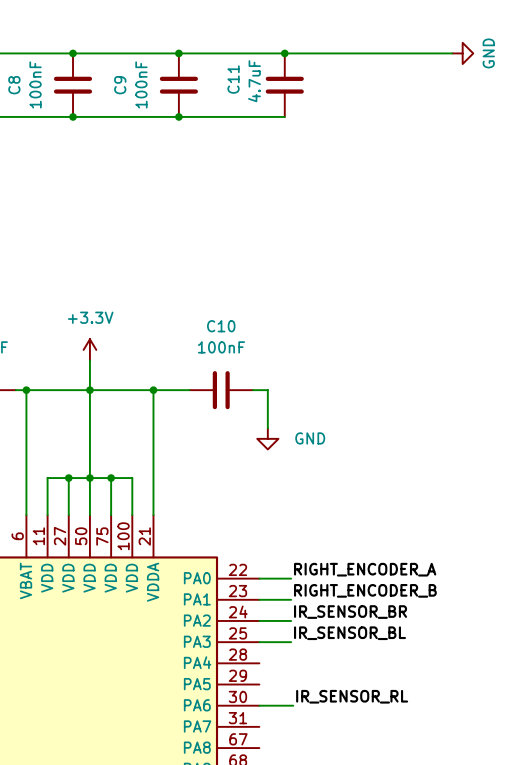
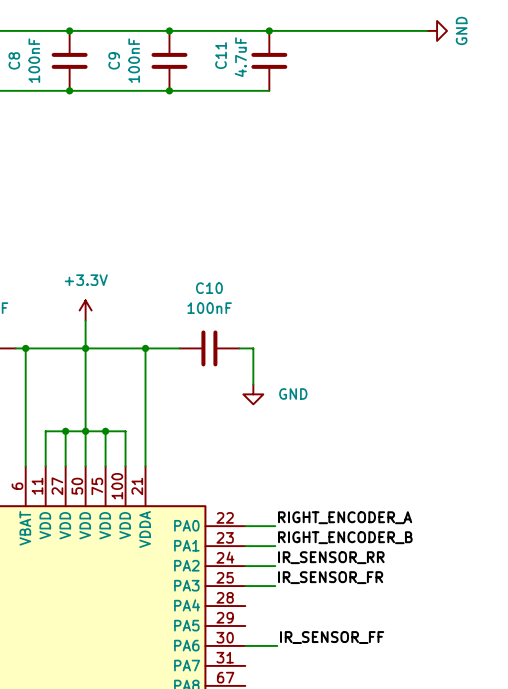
label: IR_SENSOR_BR (350, 612) -> IR_SENSOR_RR (331, 557)
label: IR_SENSOR_BL (350, 633) -> IR_SENSOR_FR (330, 577)
label: IR_SENSOR_RL (352, 696) -> IR_SENSOR_FF (332, 637)

